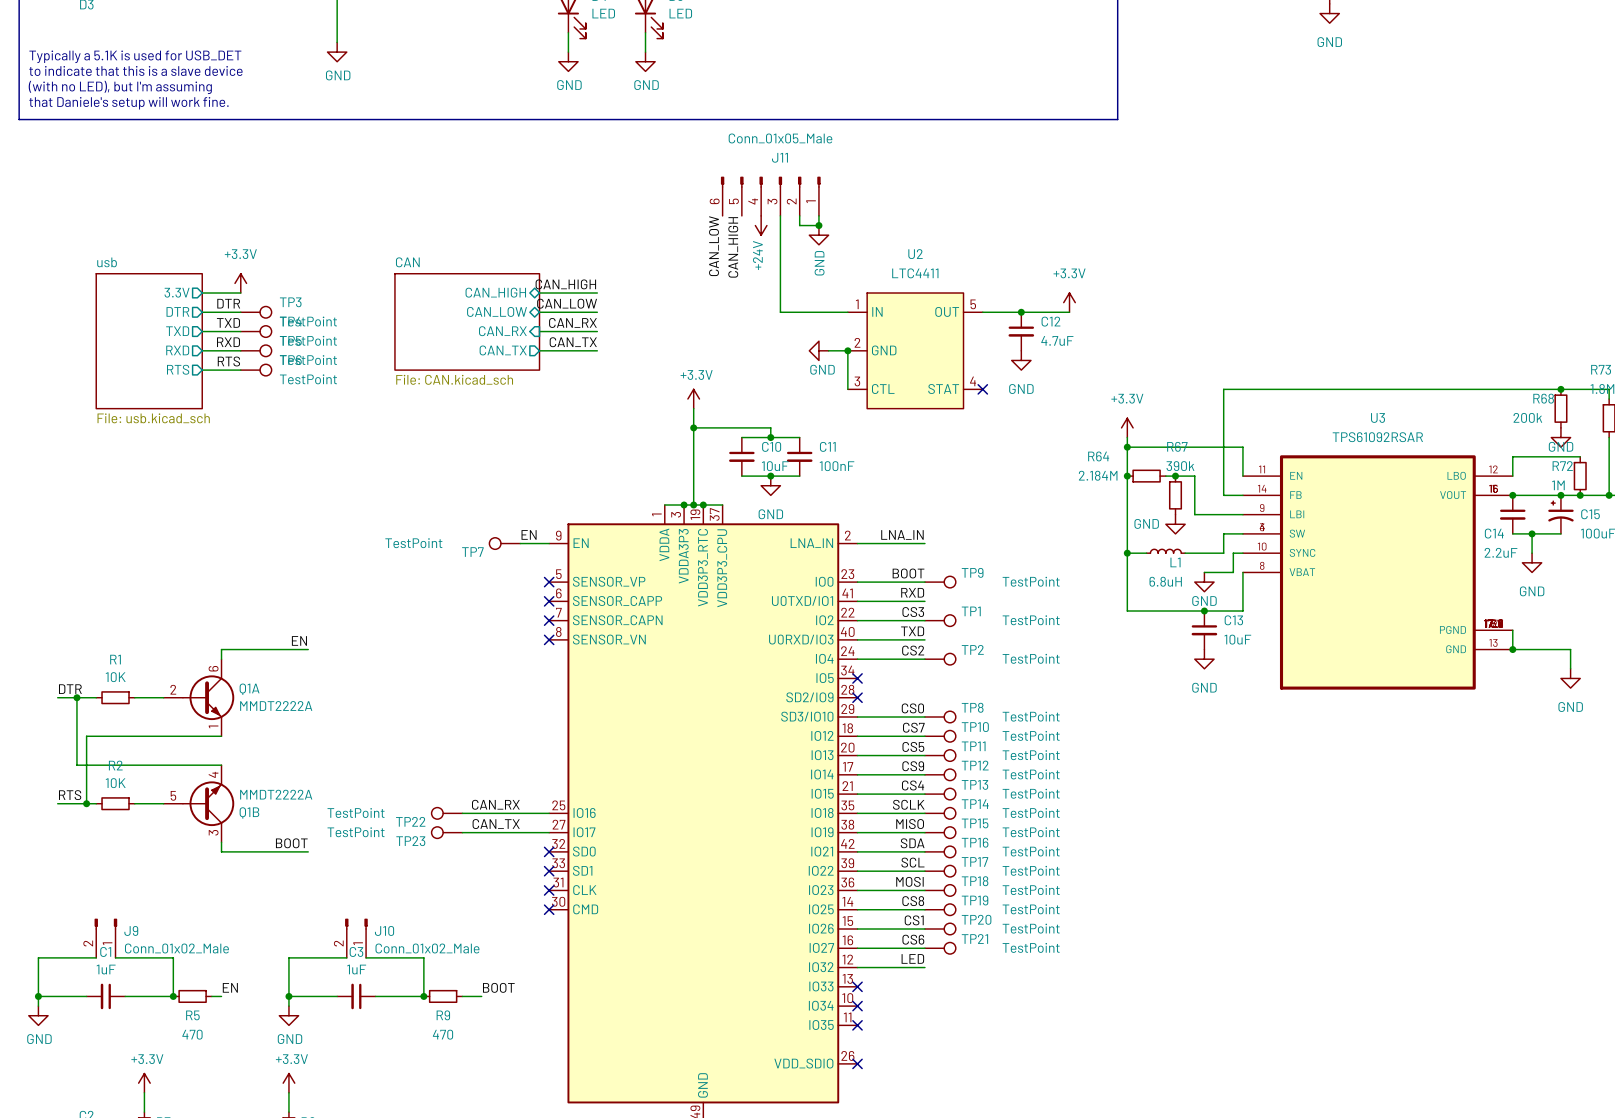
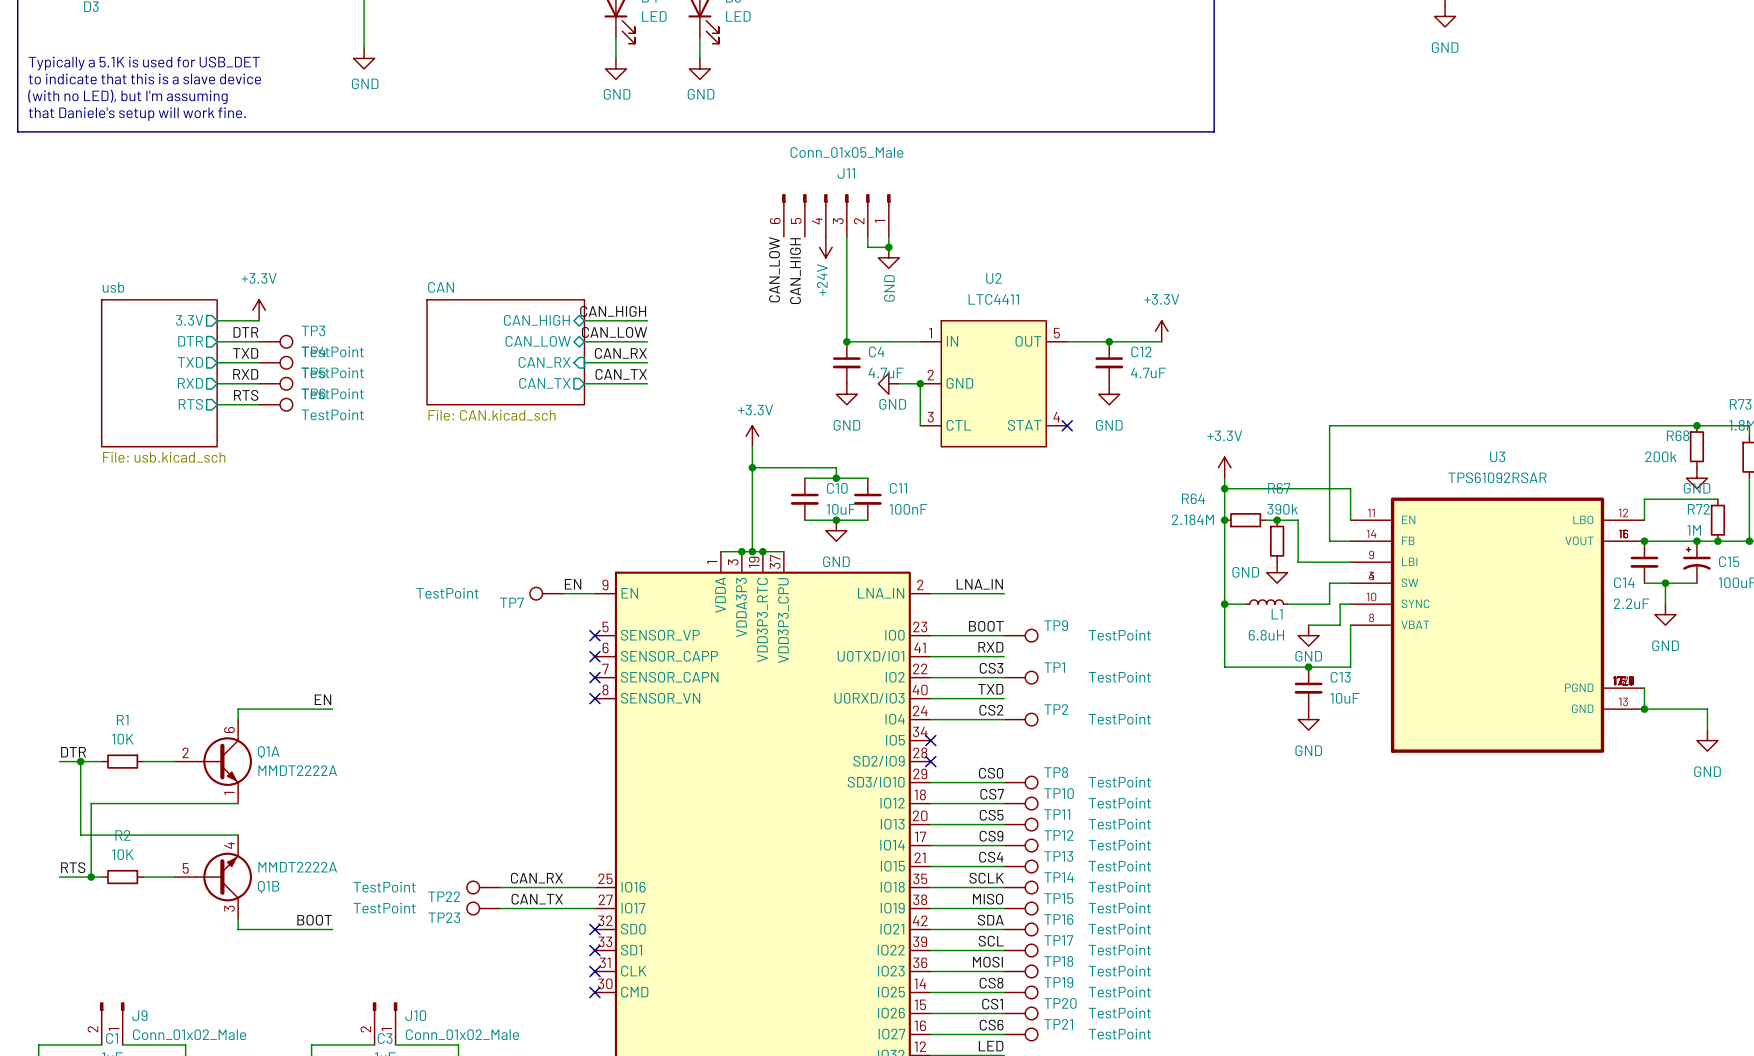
junction: none -> (846, 341)
C4: none -> 4.7uF (846, 362)
power symbol: none -> GND (846, 394)

